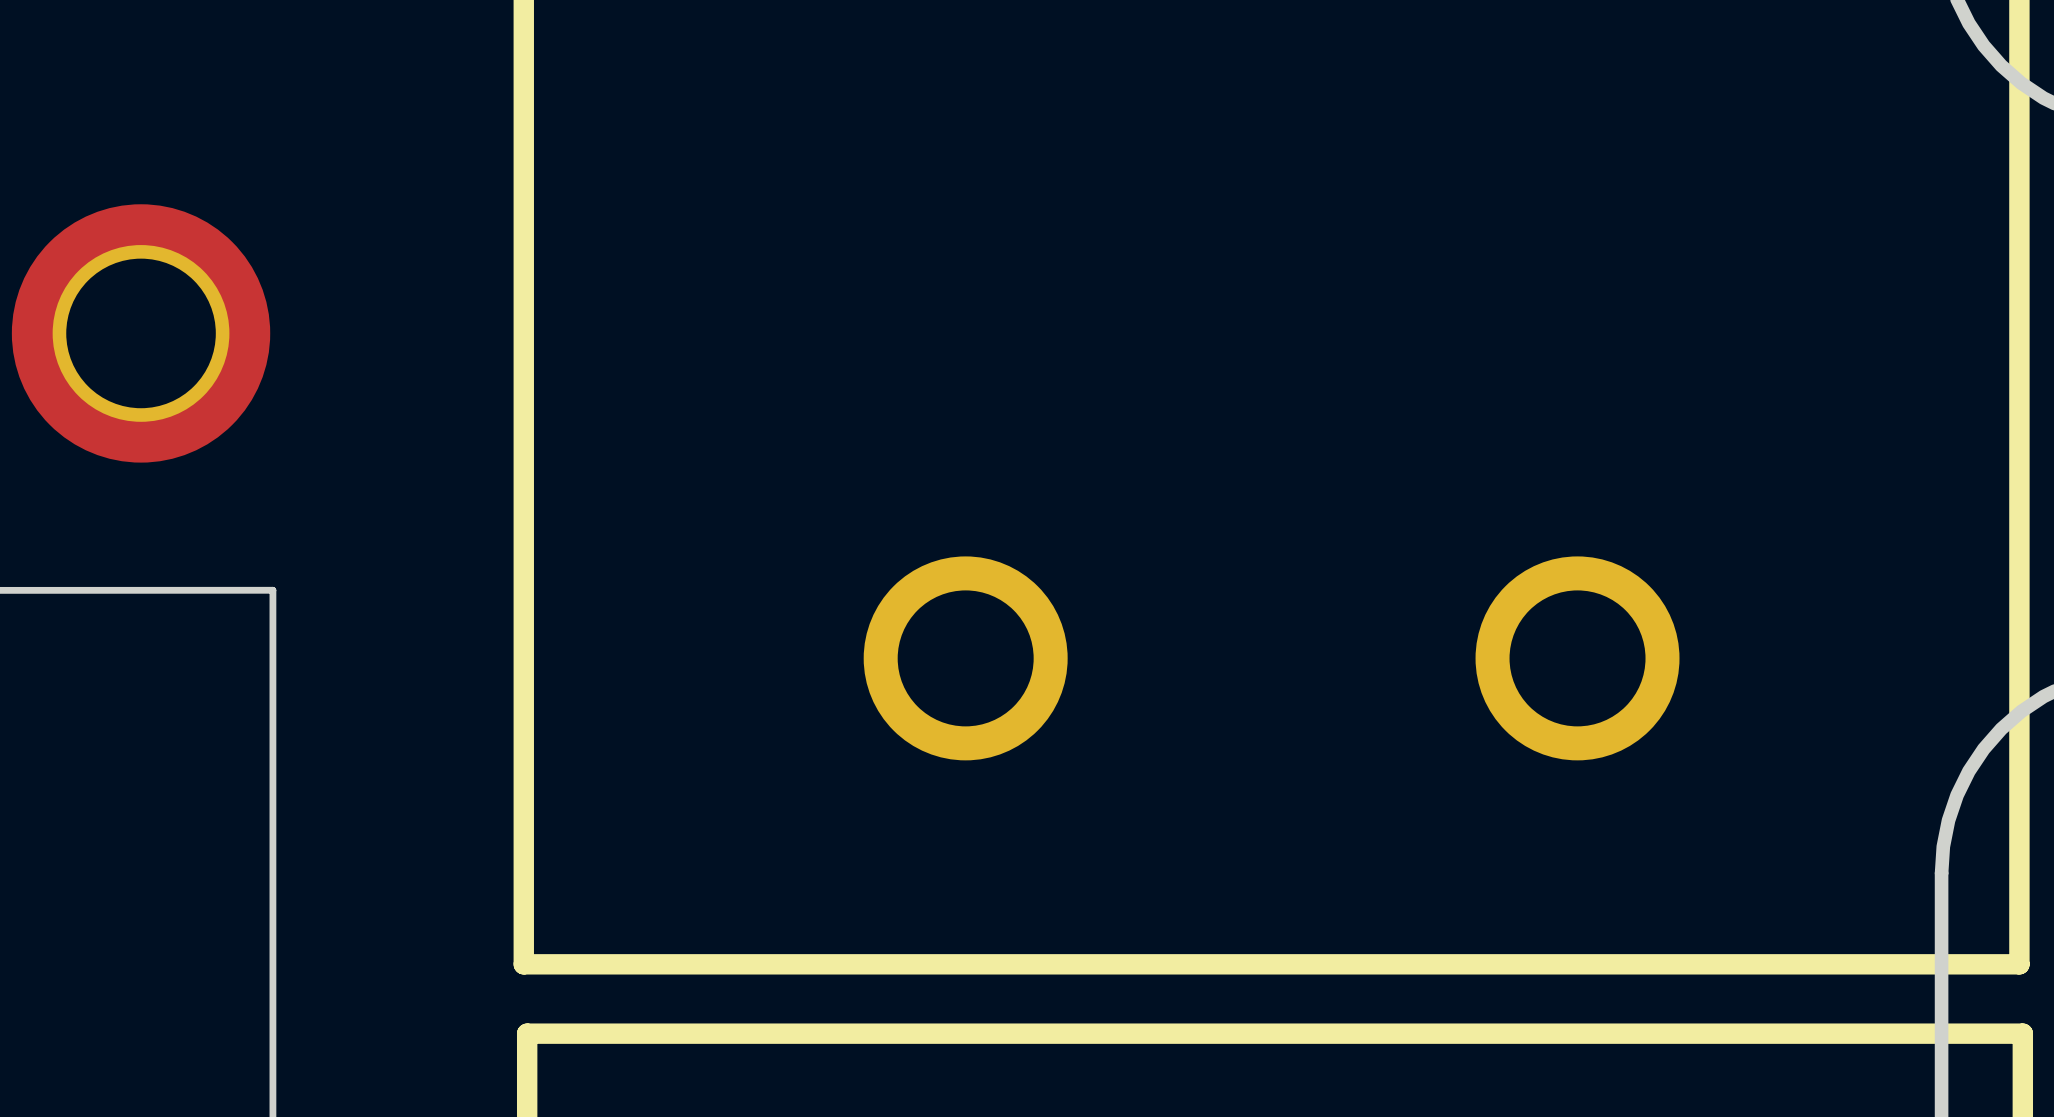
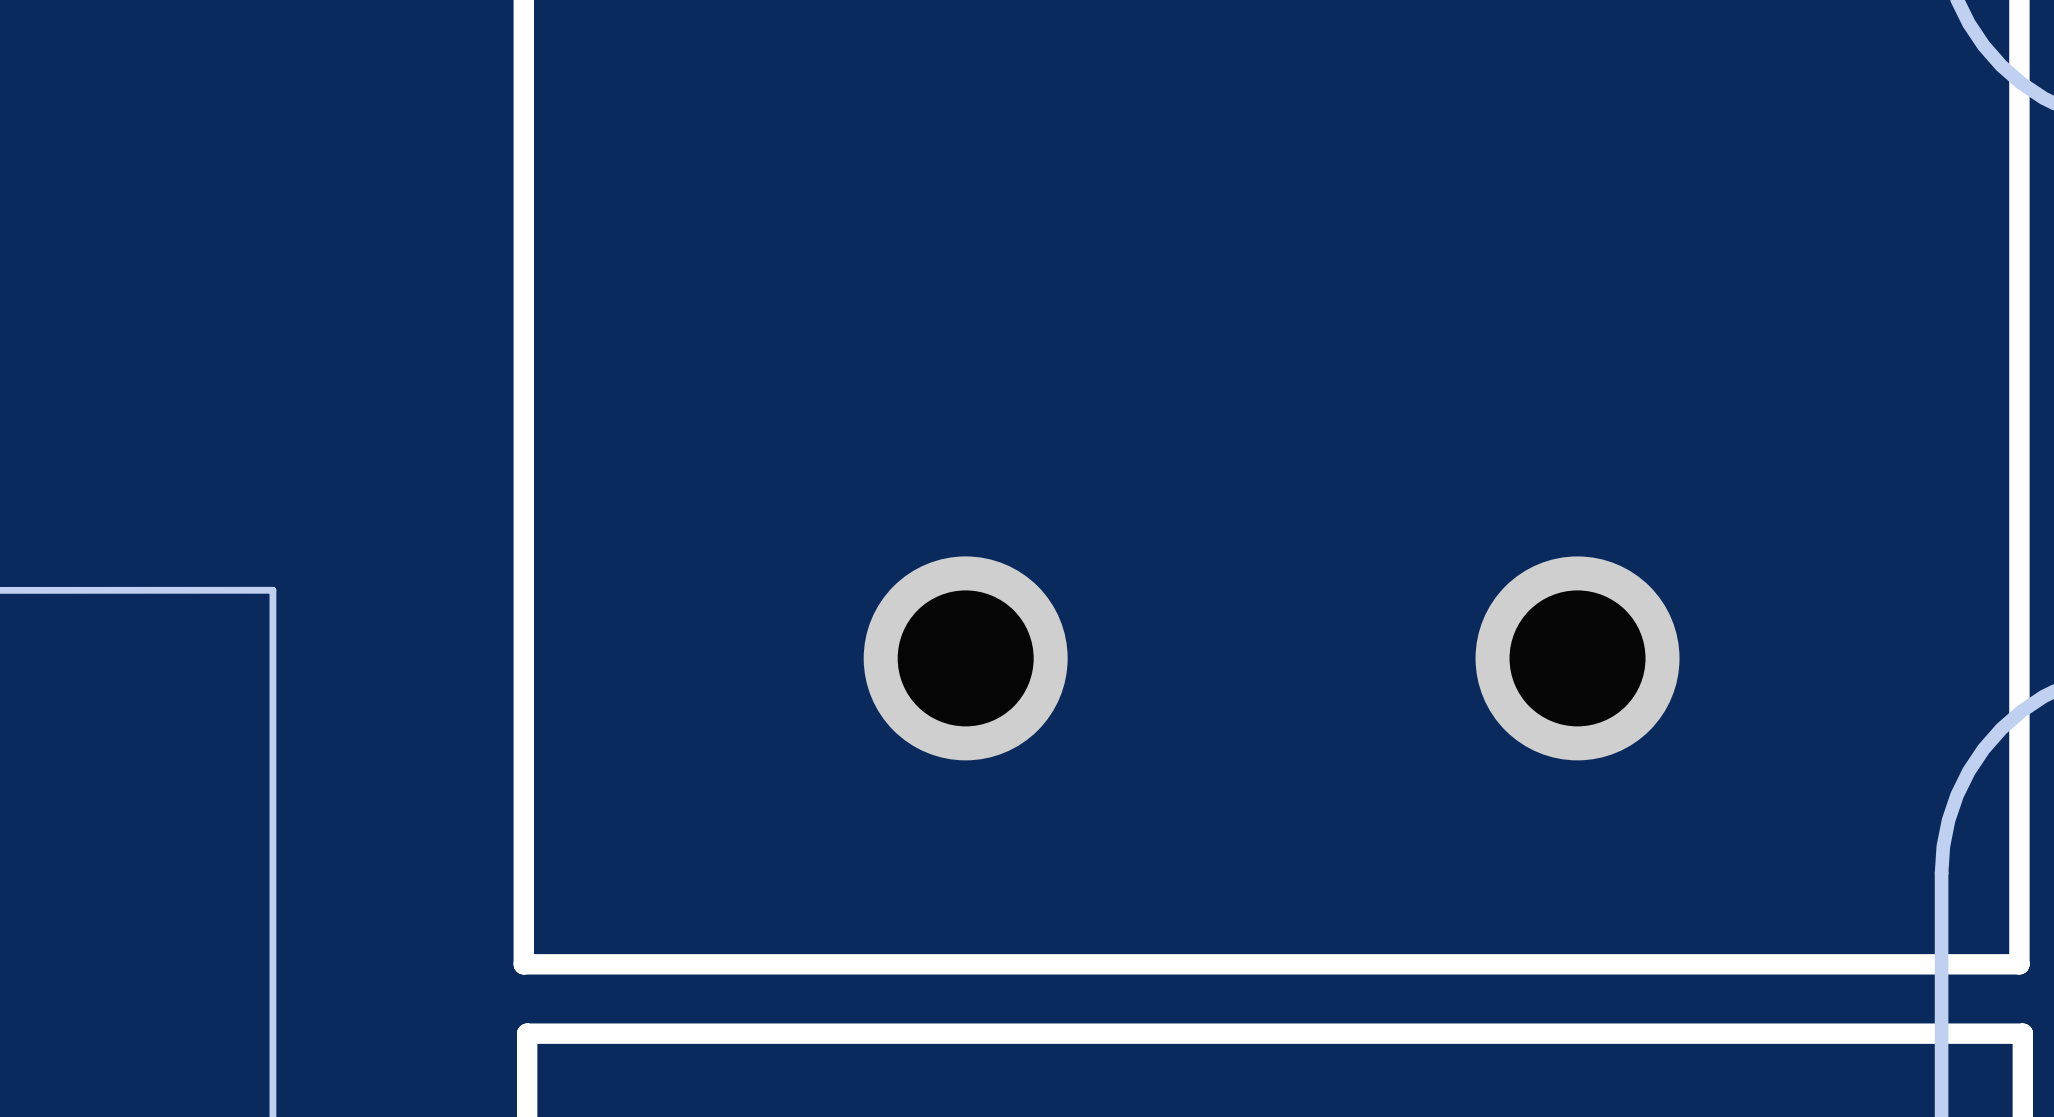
part: (141, 333) -> none

